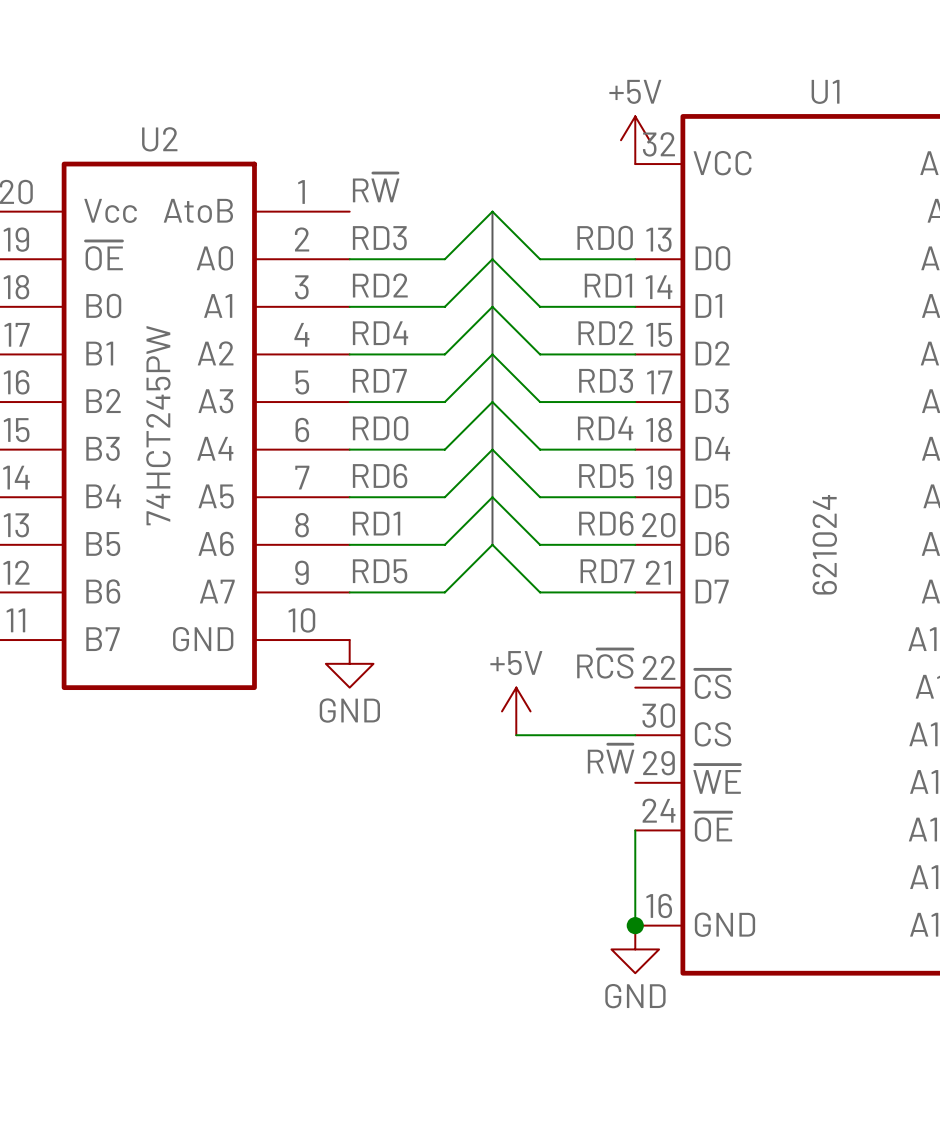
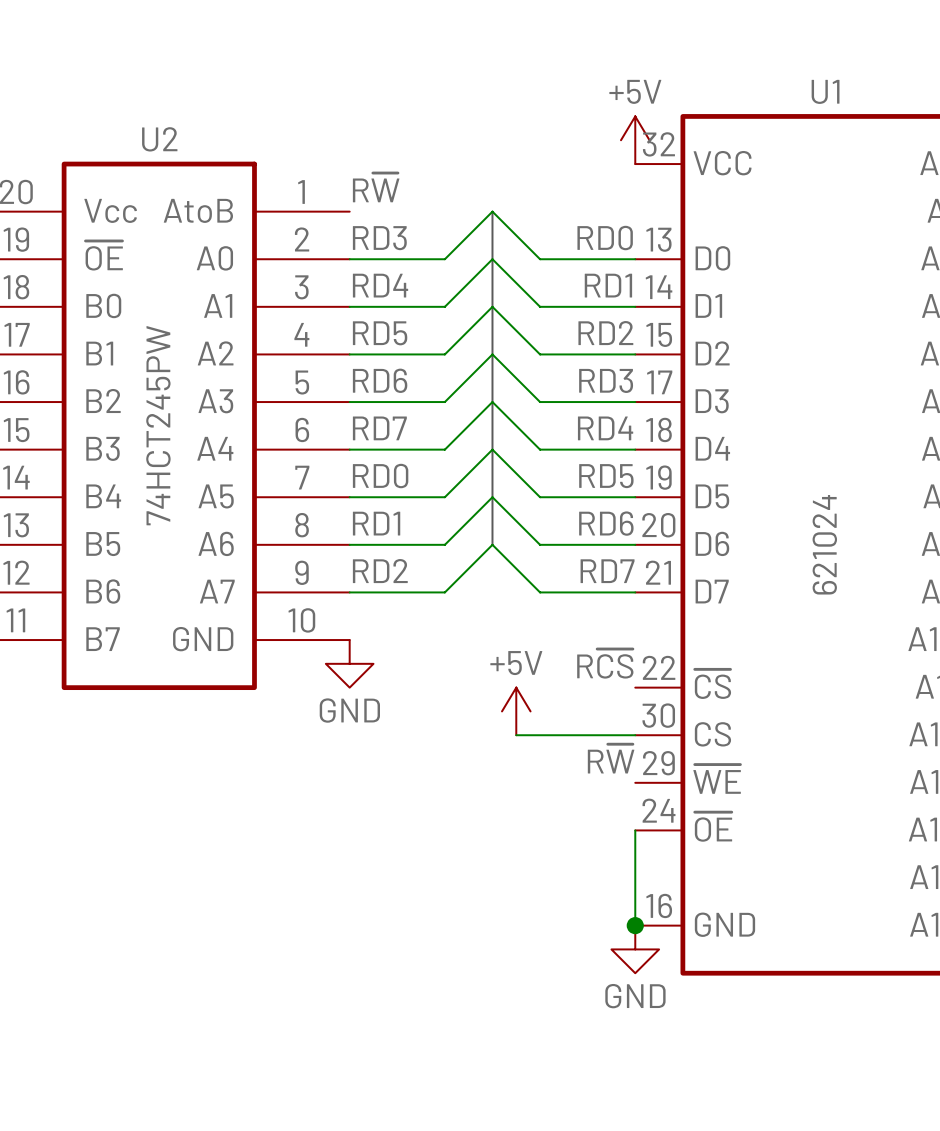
label: RD2 (380, 285) -> RD4 (380, 285)
label: RD4 (380, 333) -> RD5 (380, 333)
label: RD7 (379, 380) -> RD6 (380, 380)
label: RD0 (380, 428) -> RD7 (379, 428)
label: RD6 (380, 475) -> RD0 (380, 476)
label: RD5 (380, 571) -> RD2 (380, 571)

